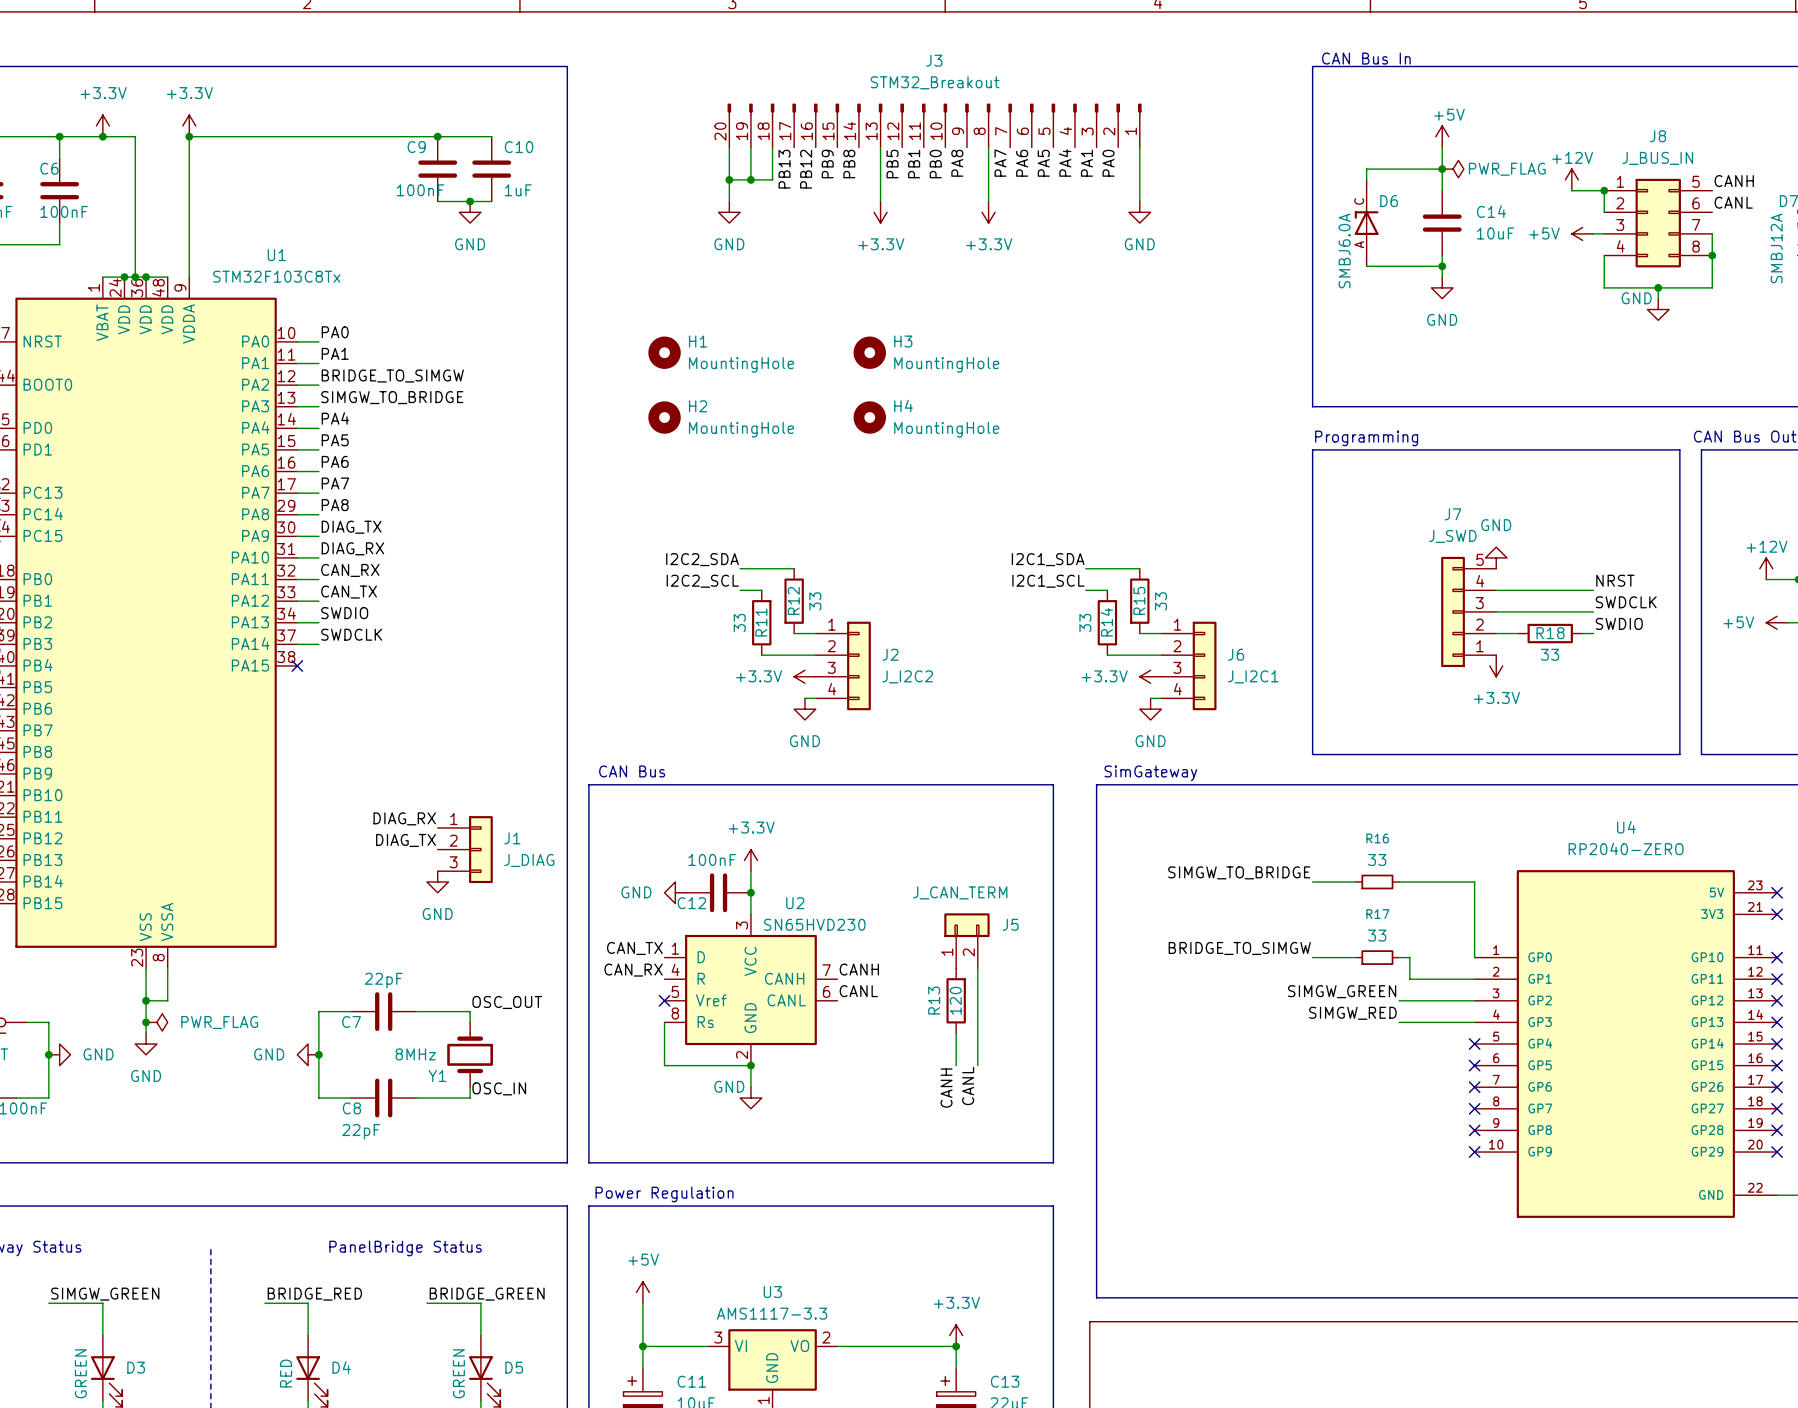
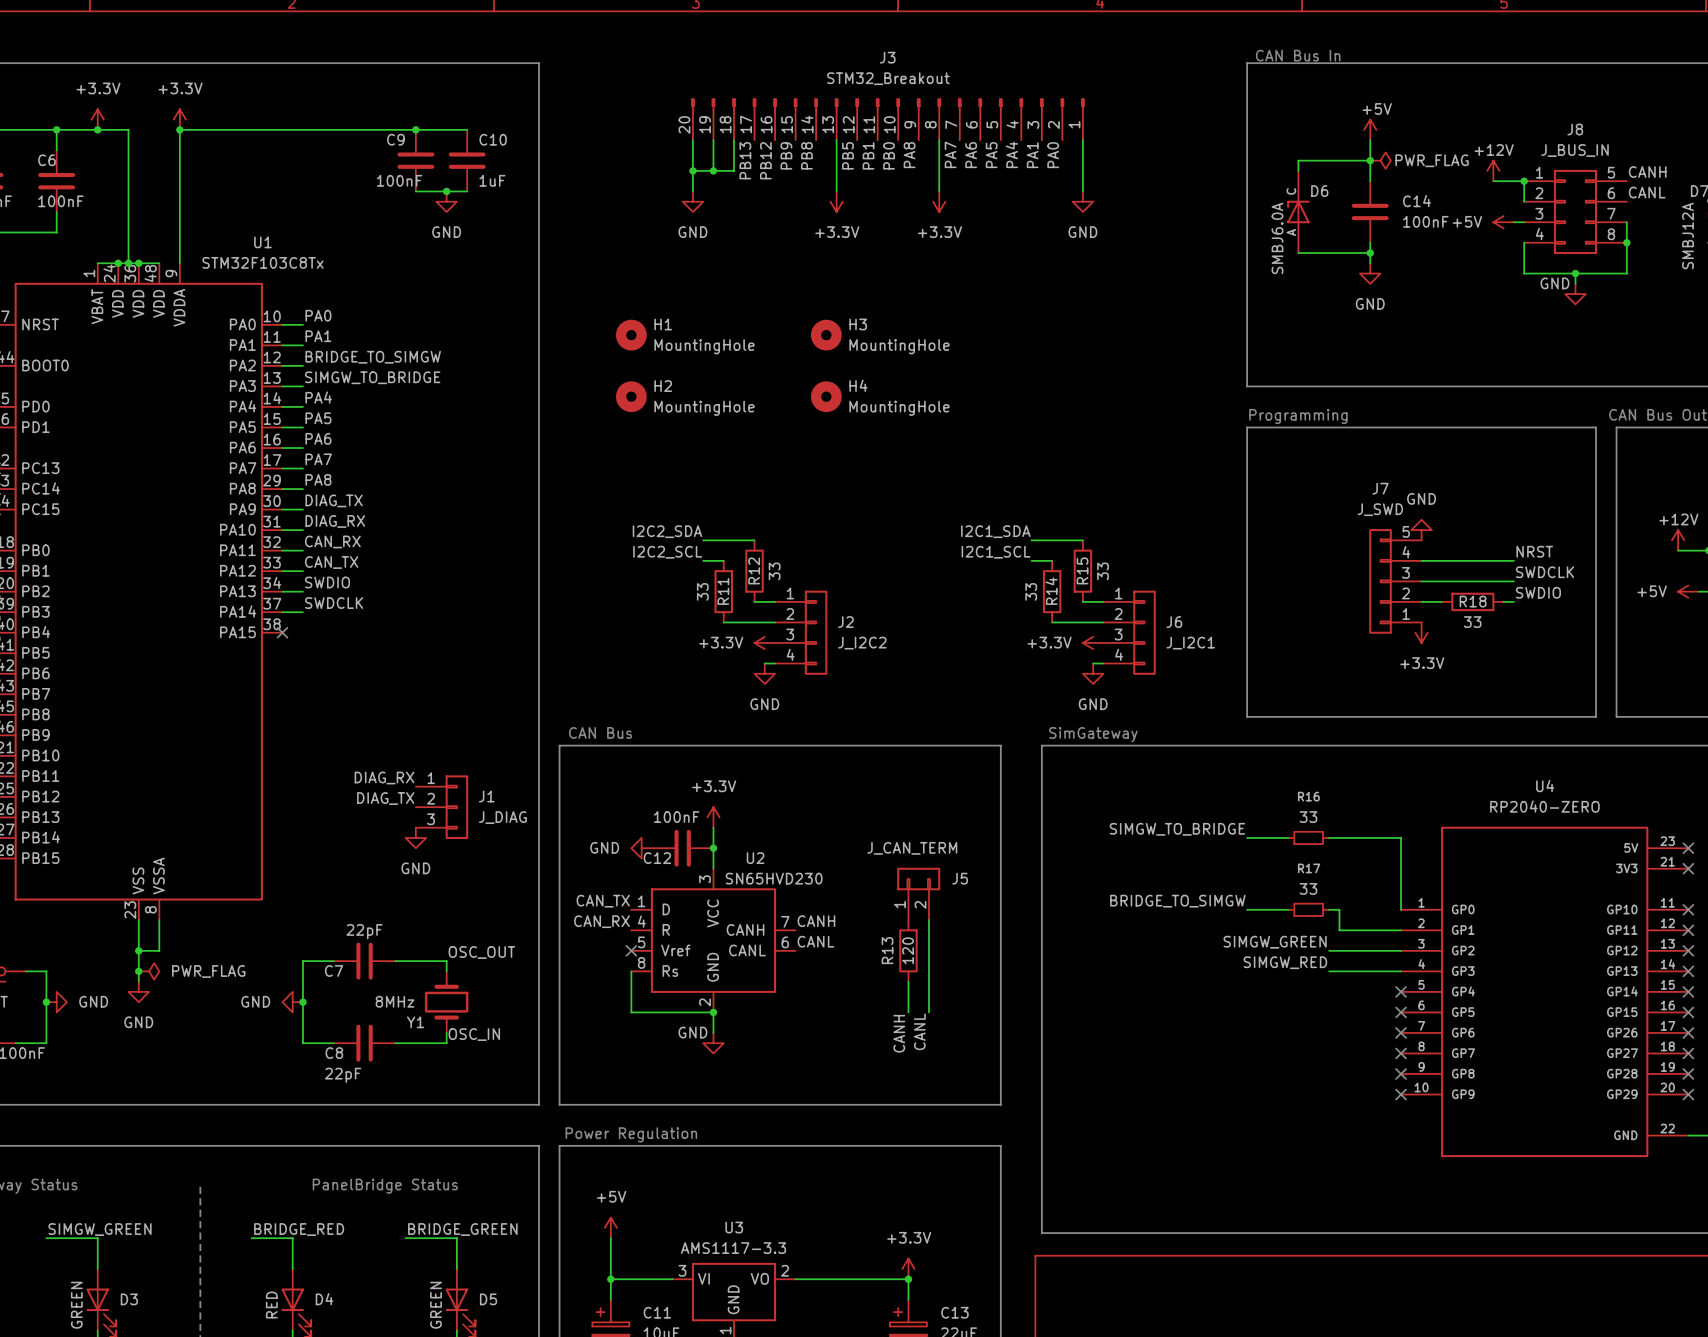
C14 value: 10uF (1495, 233) -> 100nF (1425, 221)

